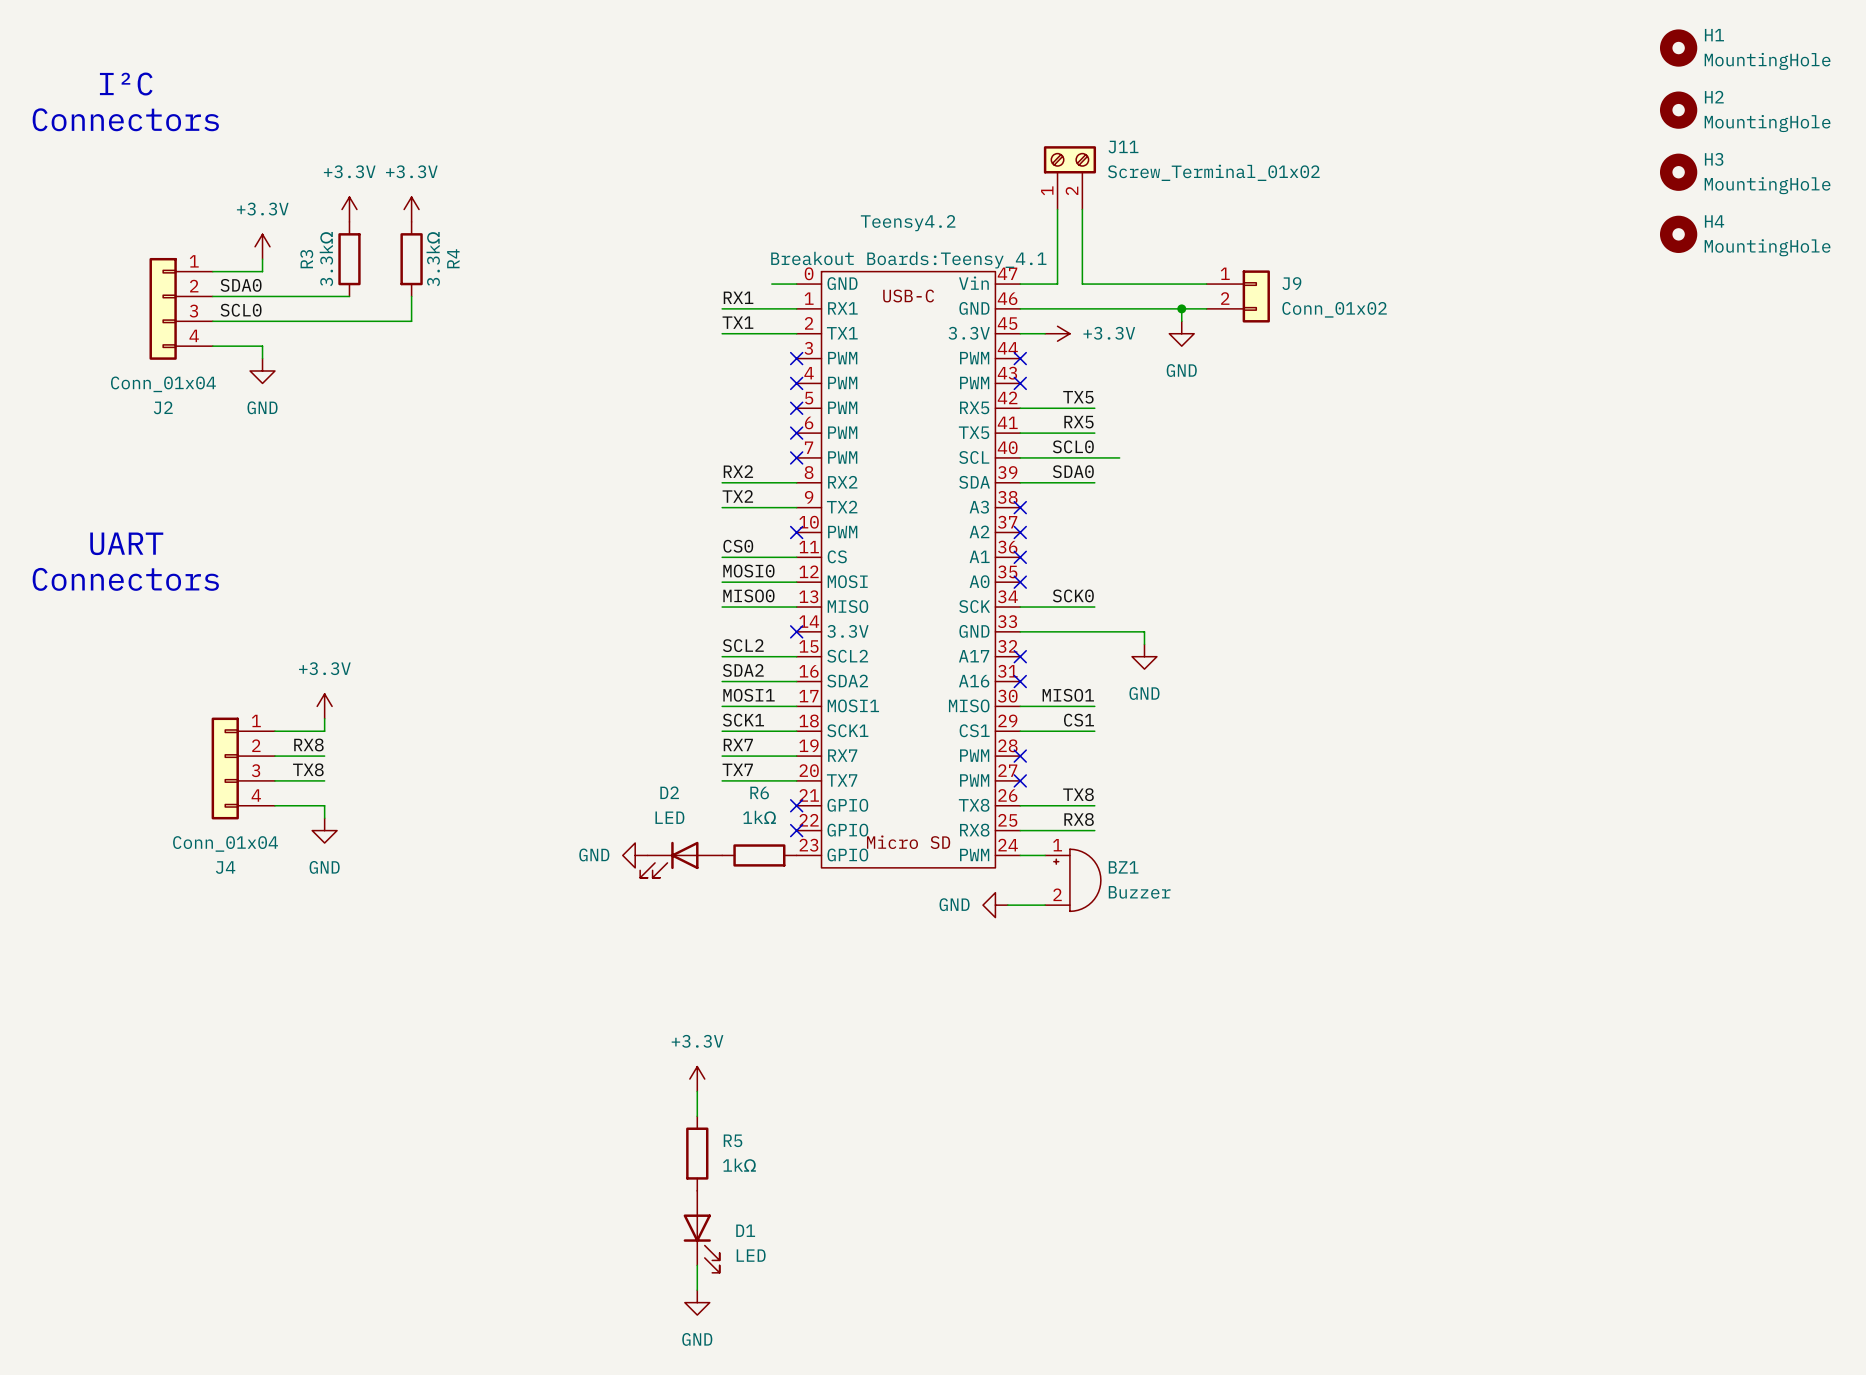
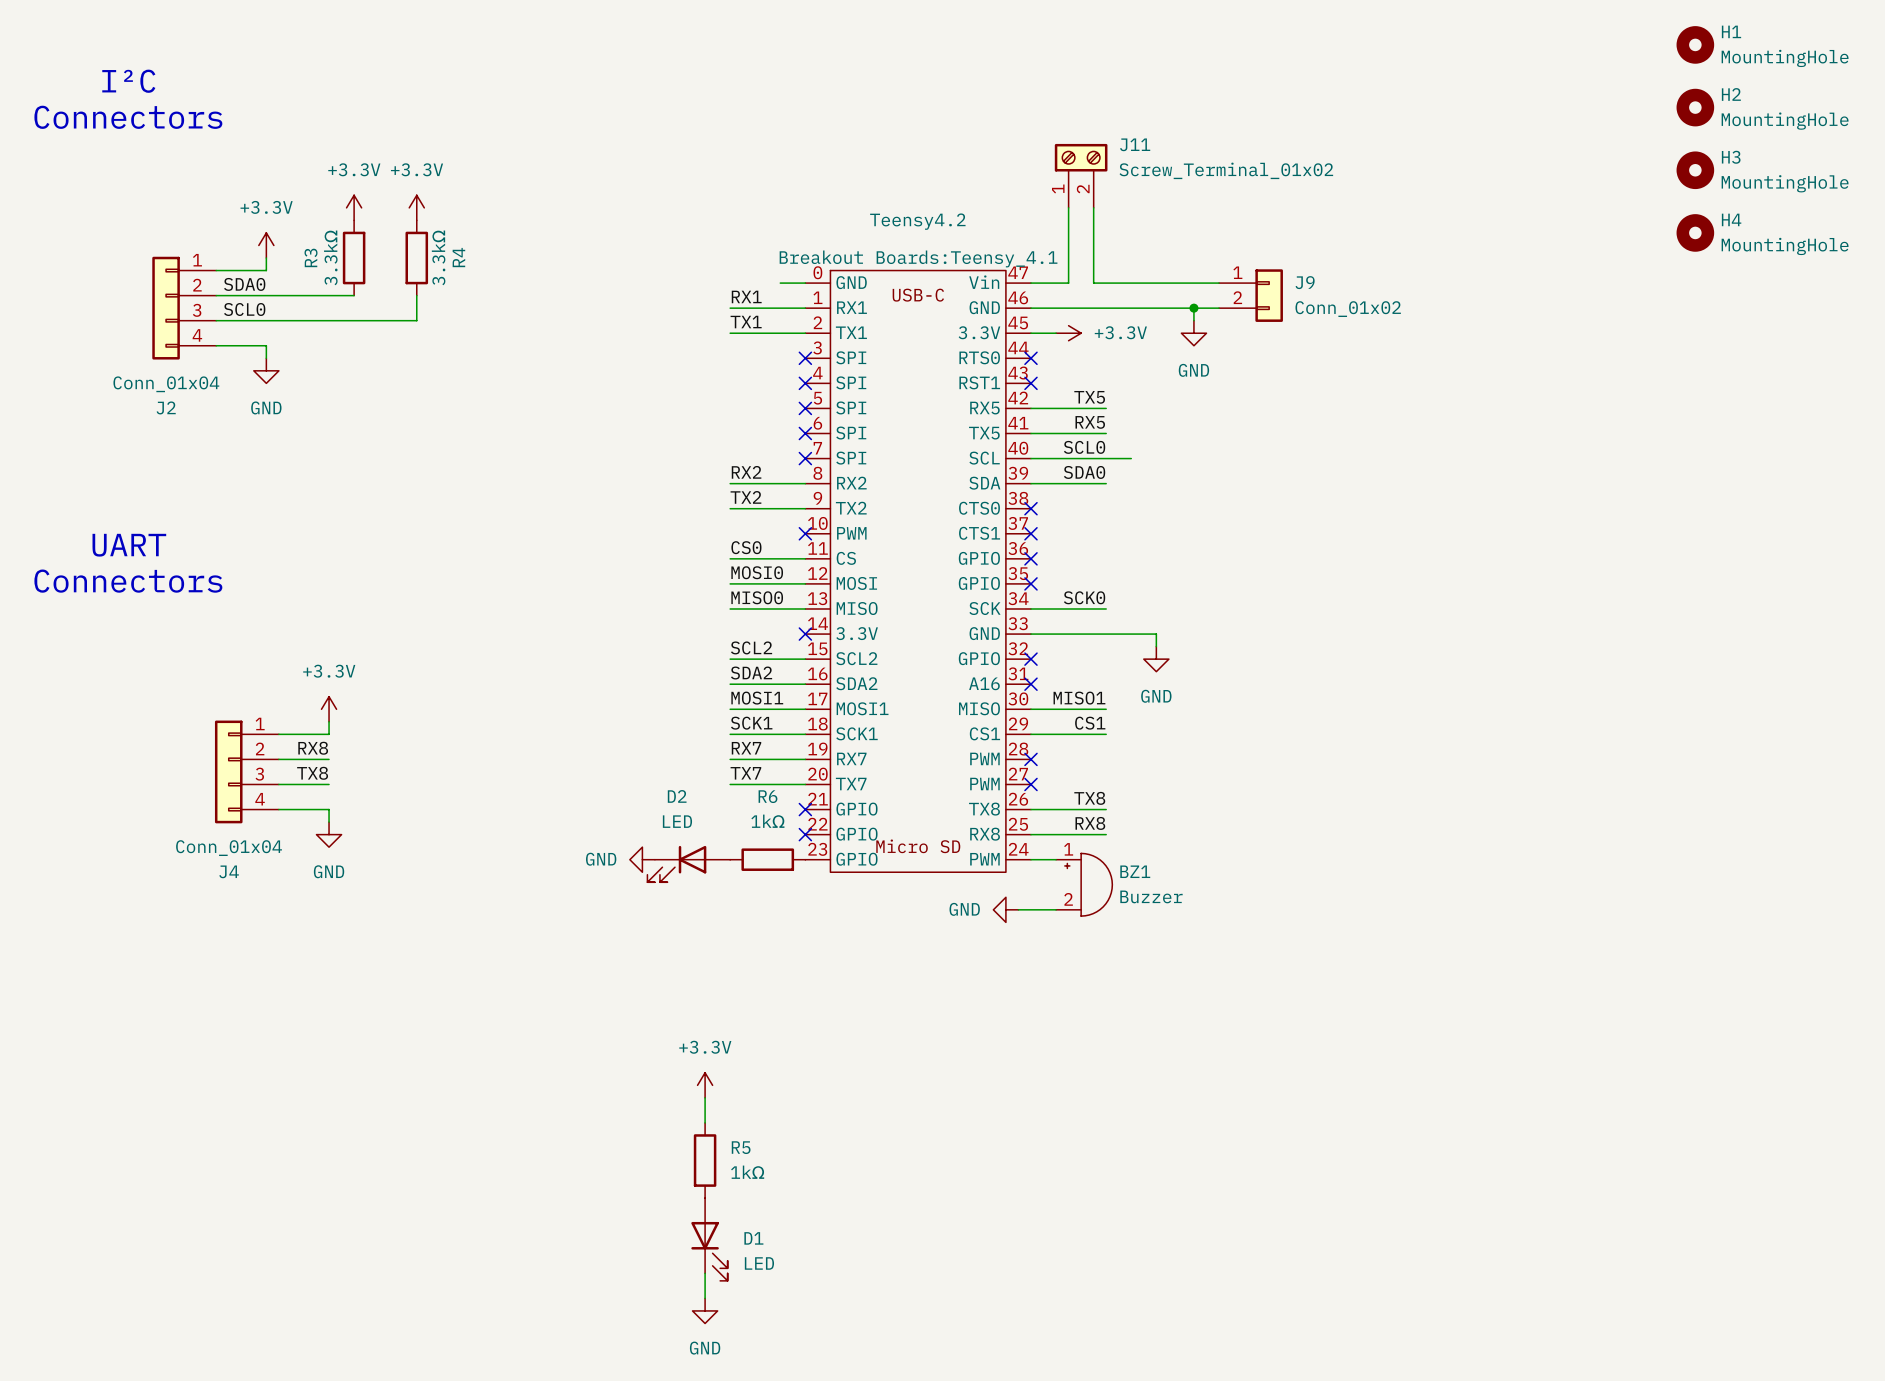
Teensy4.2 symbol: [796, 271, 1021, 868] -> [805, 270, 1031, 873]

